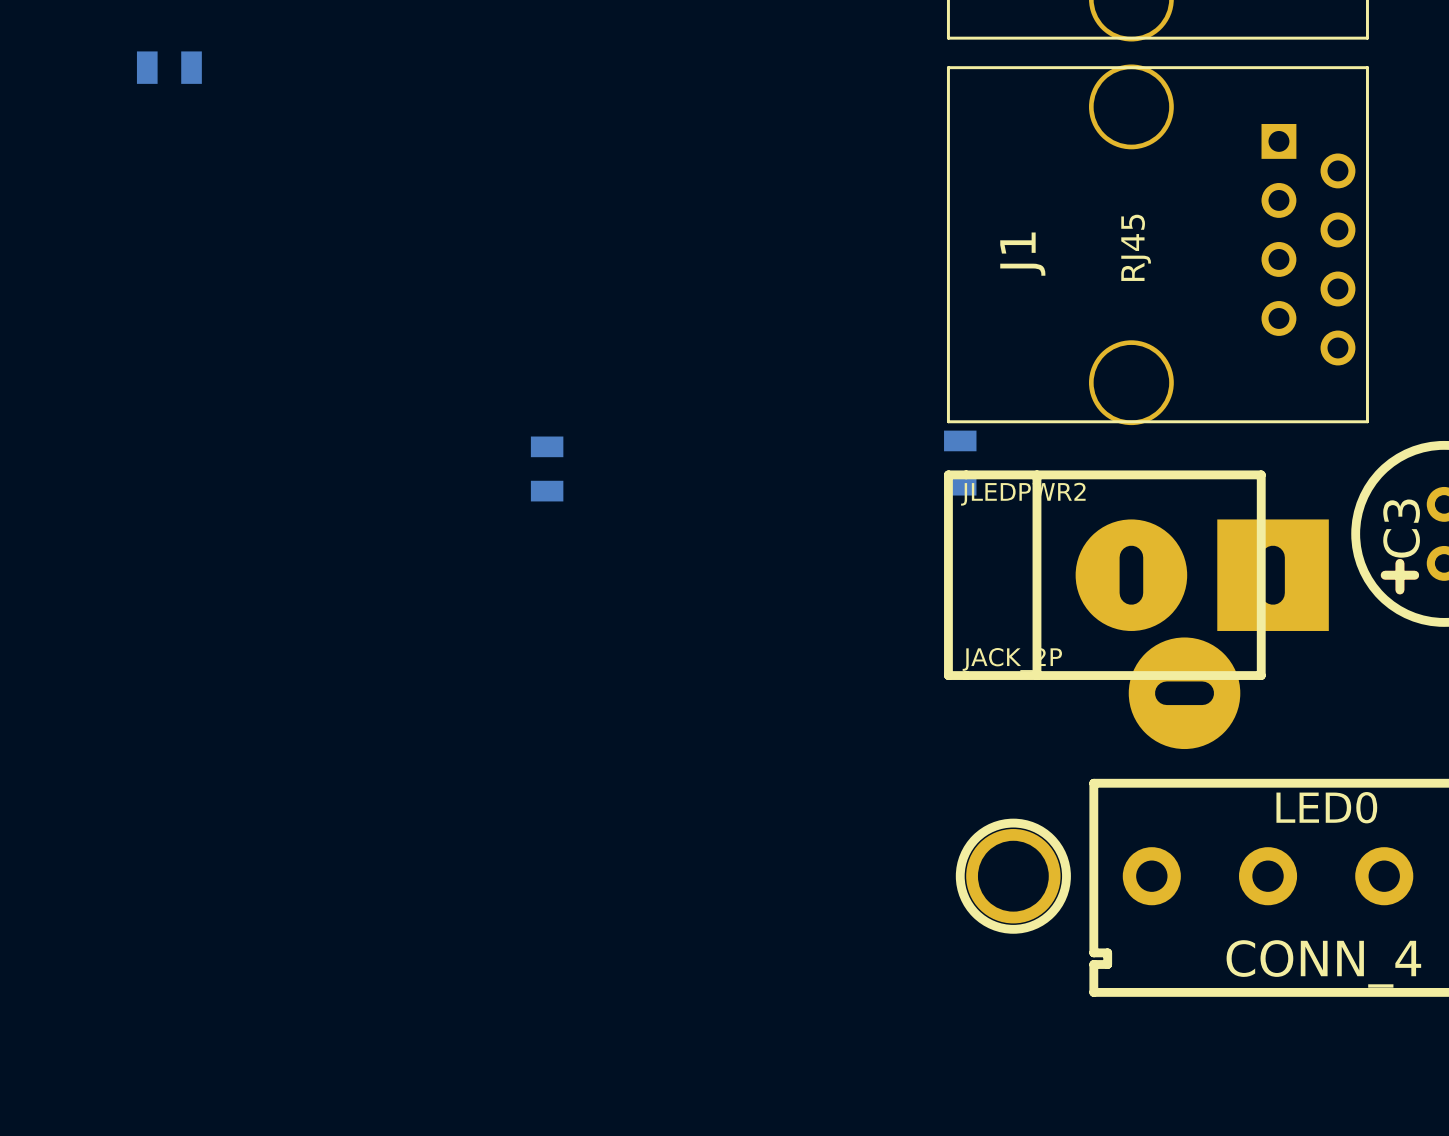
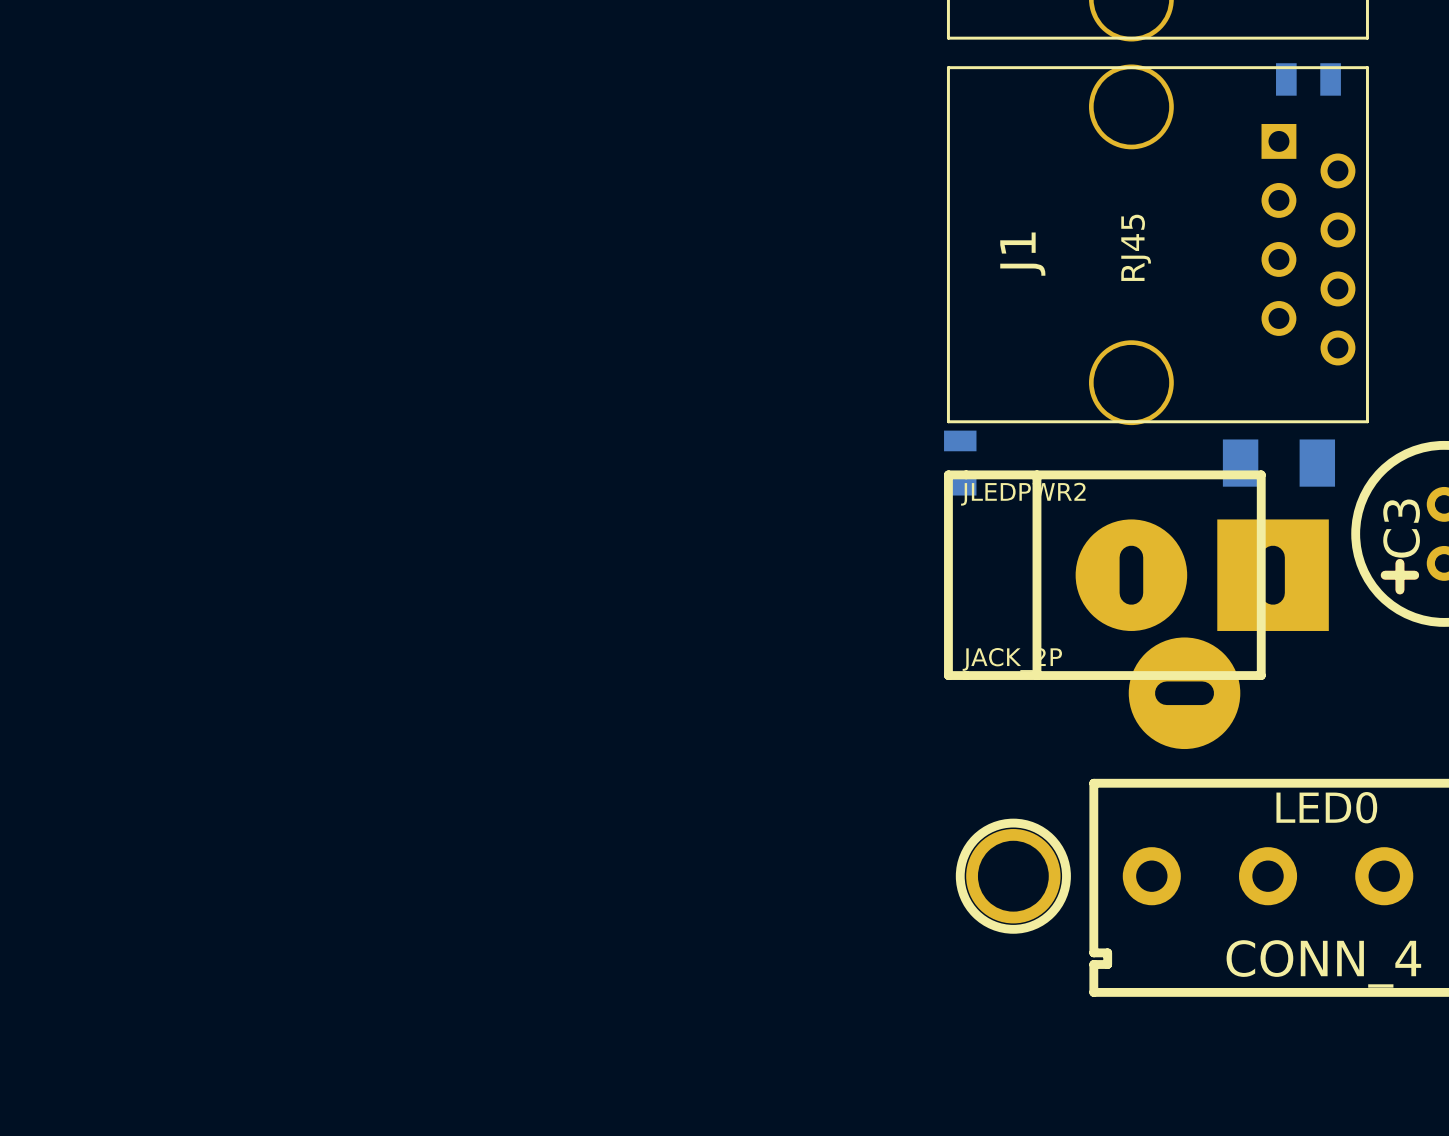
part: (169, 67) -> none
part: none -> (1308, 79)
part: none -> (1278, 463)
part: (547, 468) -> none

